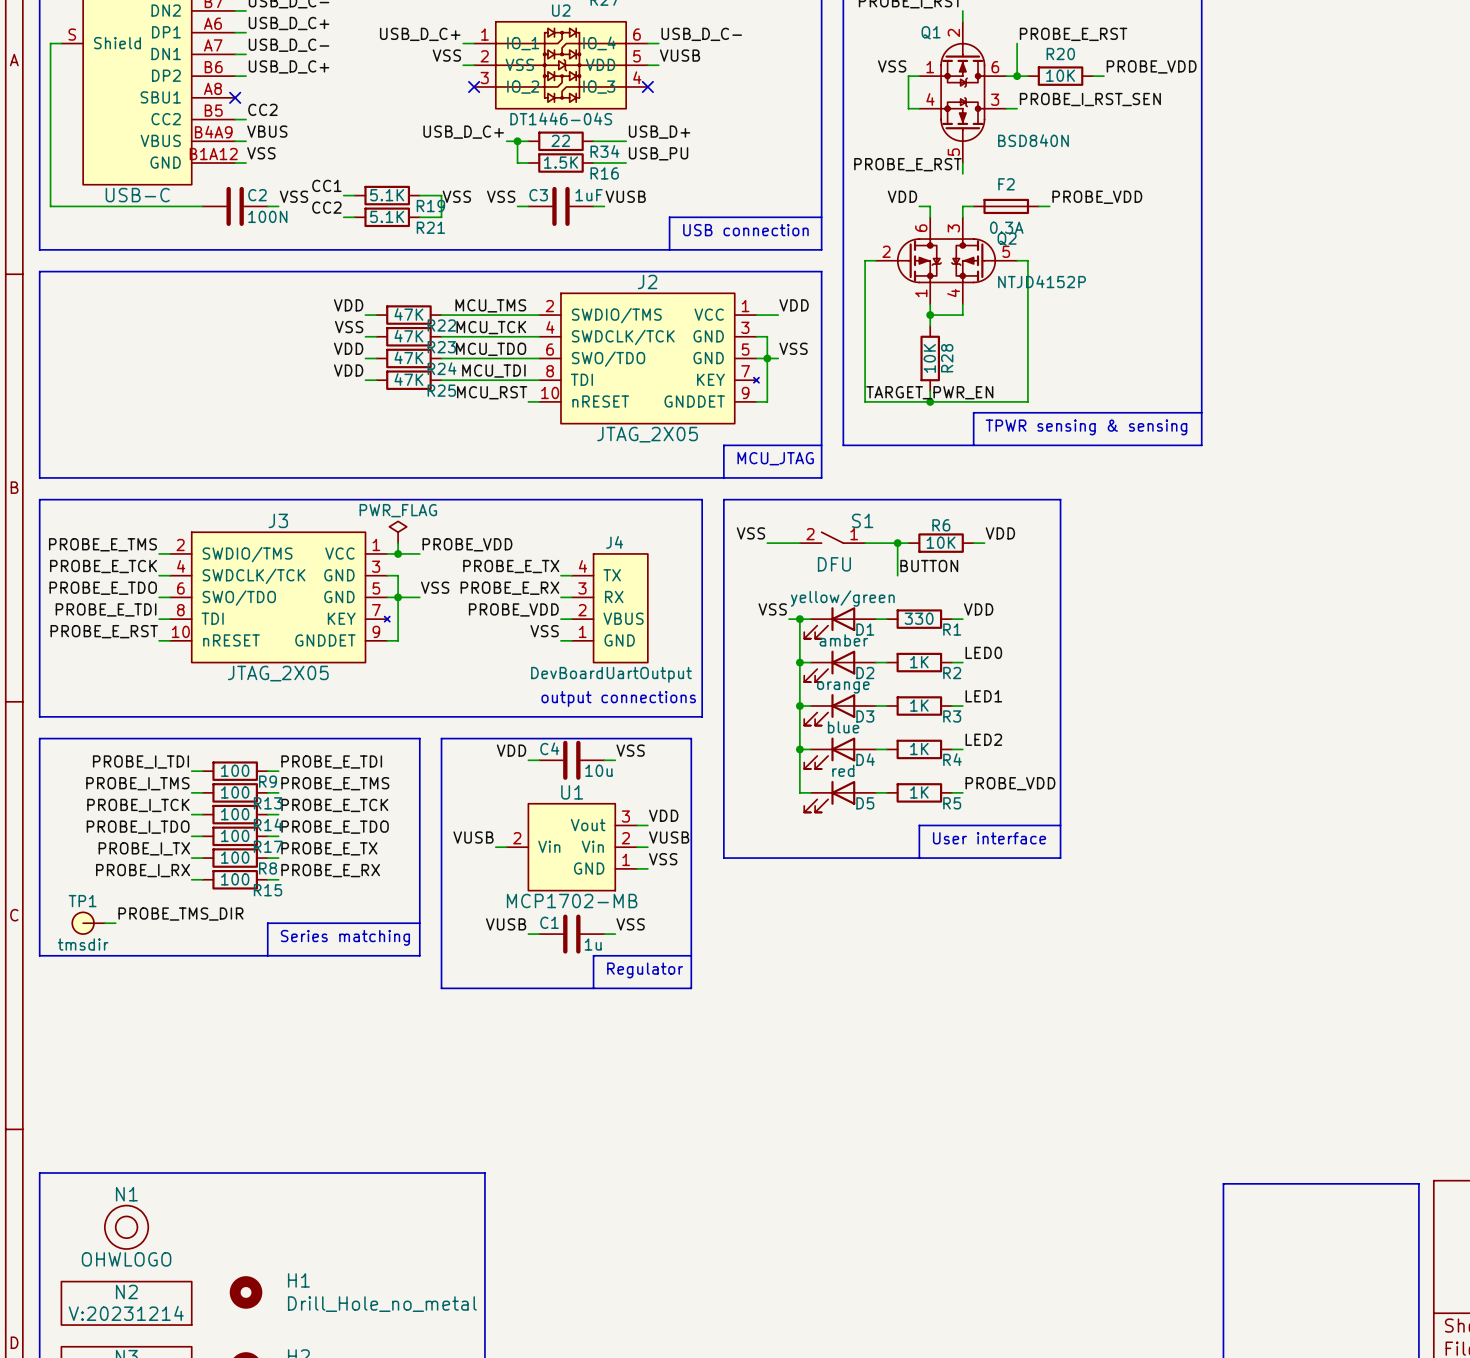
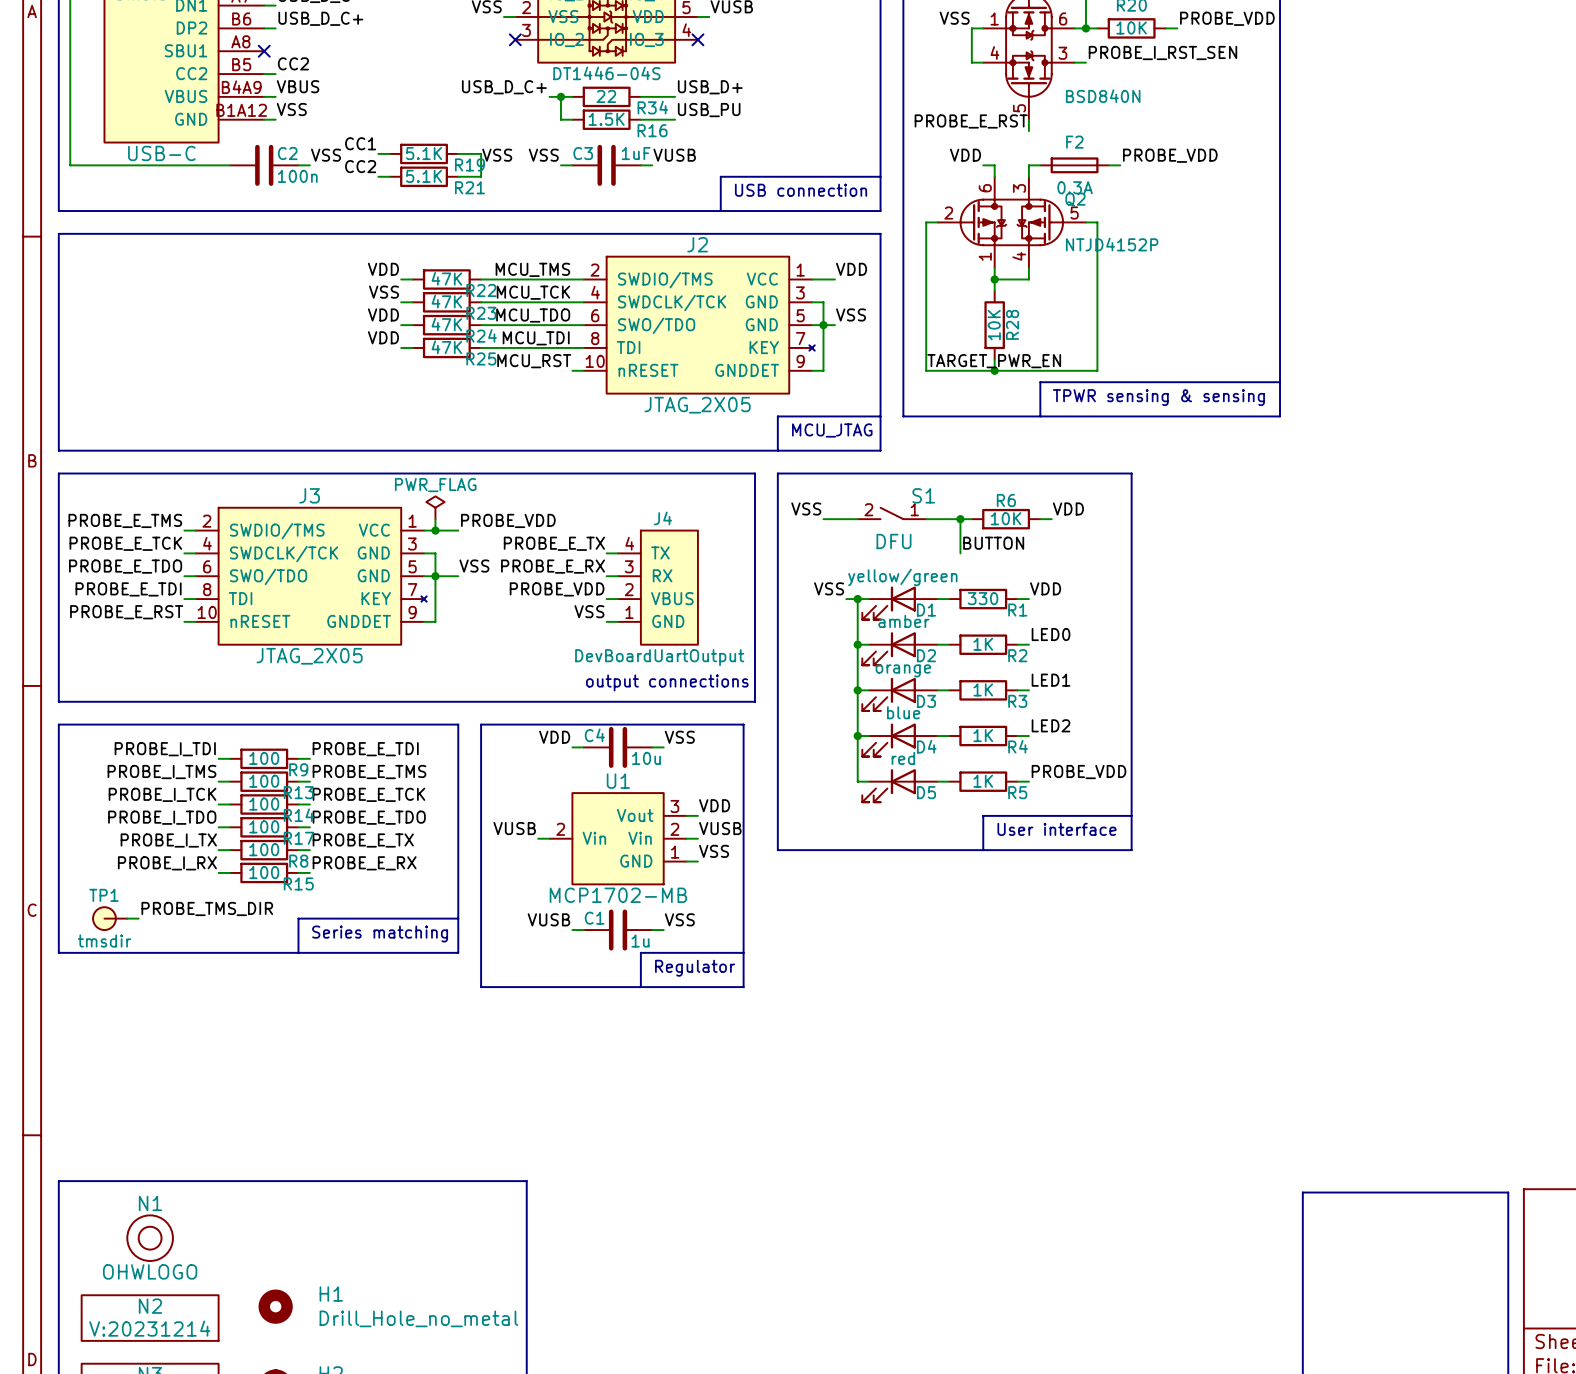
C2 value: 100N (267, 216) -> 100n (297, 176)

